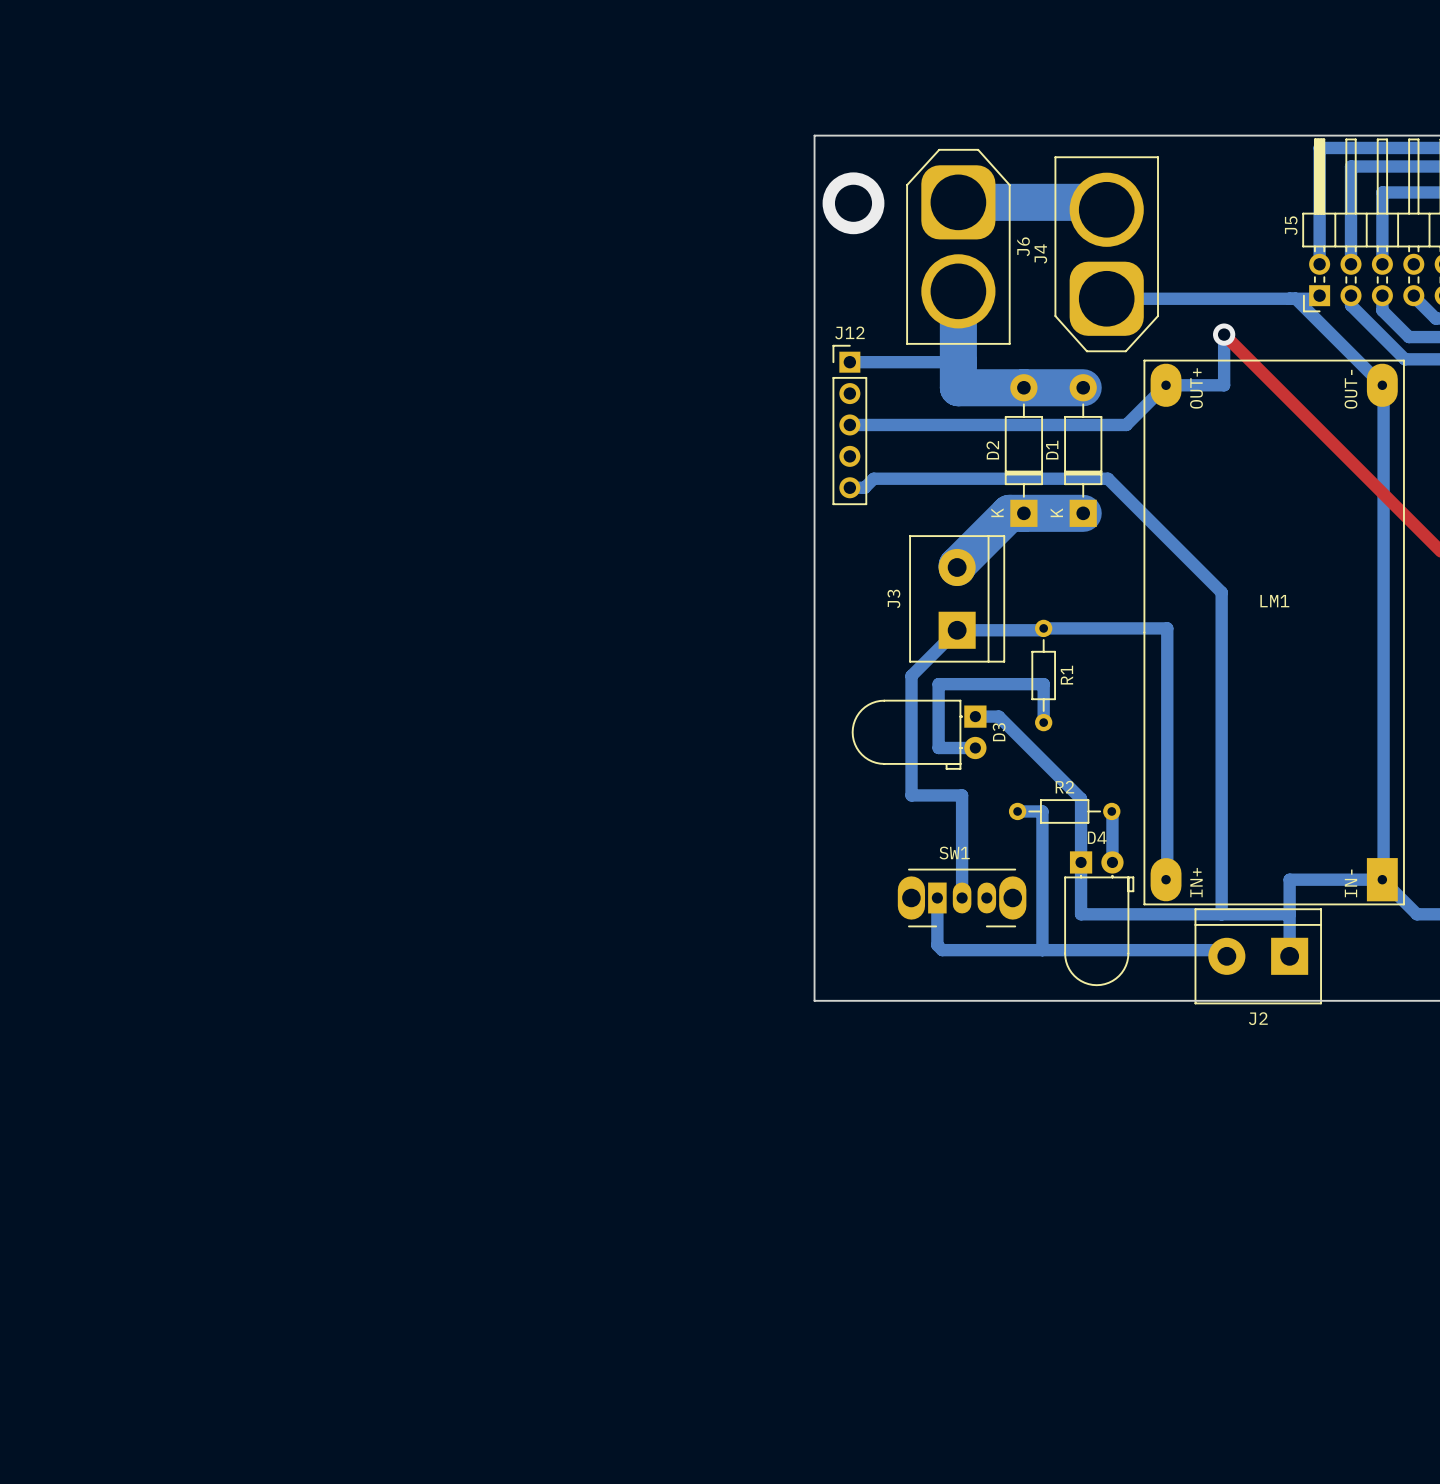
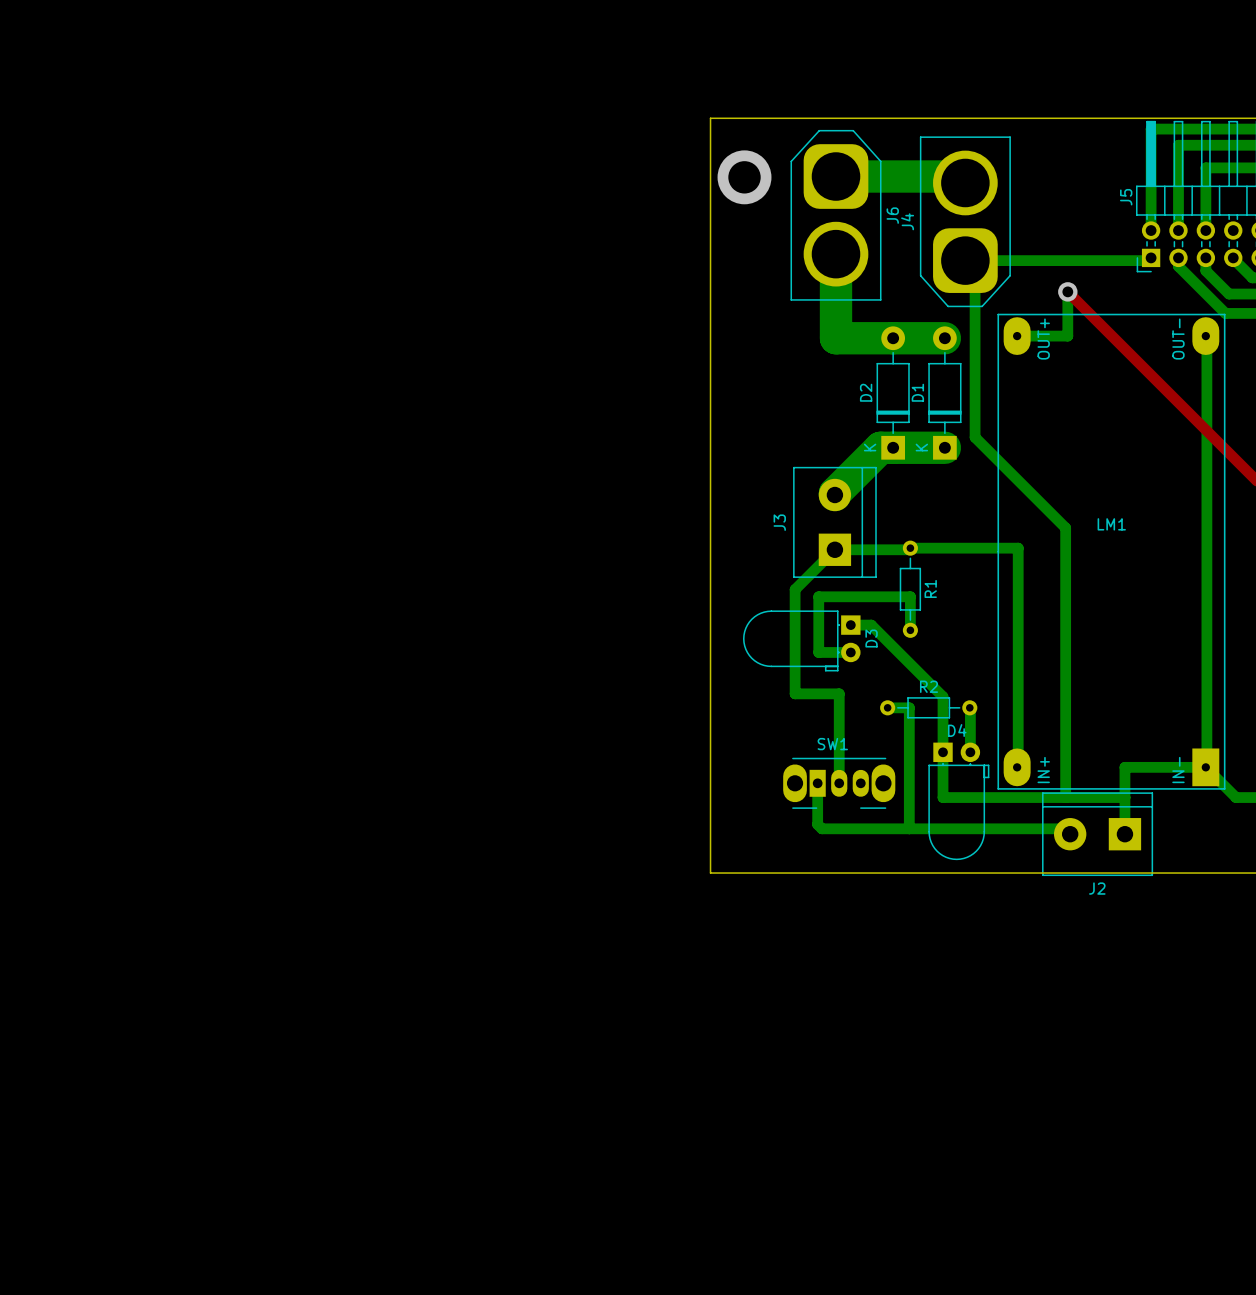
bottom track: (1295, 298) (1382, 385) -> none
bottom track: (849, 362) (958, 362) -> none
bottom track: (1166, 385) (1126, 424) (849, 424) -> none
J12: (849, 424) -> none
bottom track: (849, 487) (864, 487) (873, 478) (1107, 478) (1221, 592) (1221, 605) -> (975, 270) (975, 437) (1065, 527)

